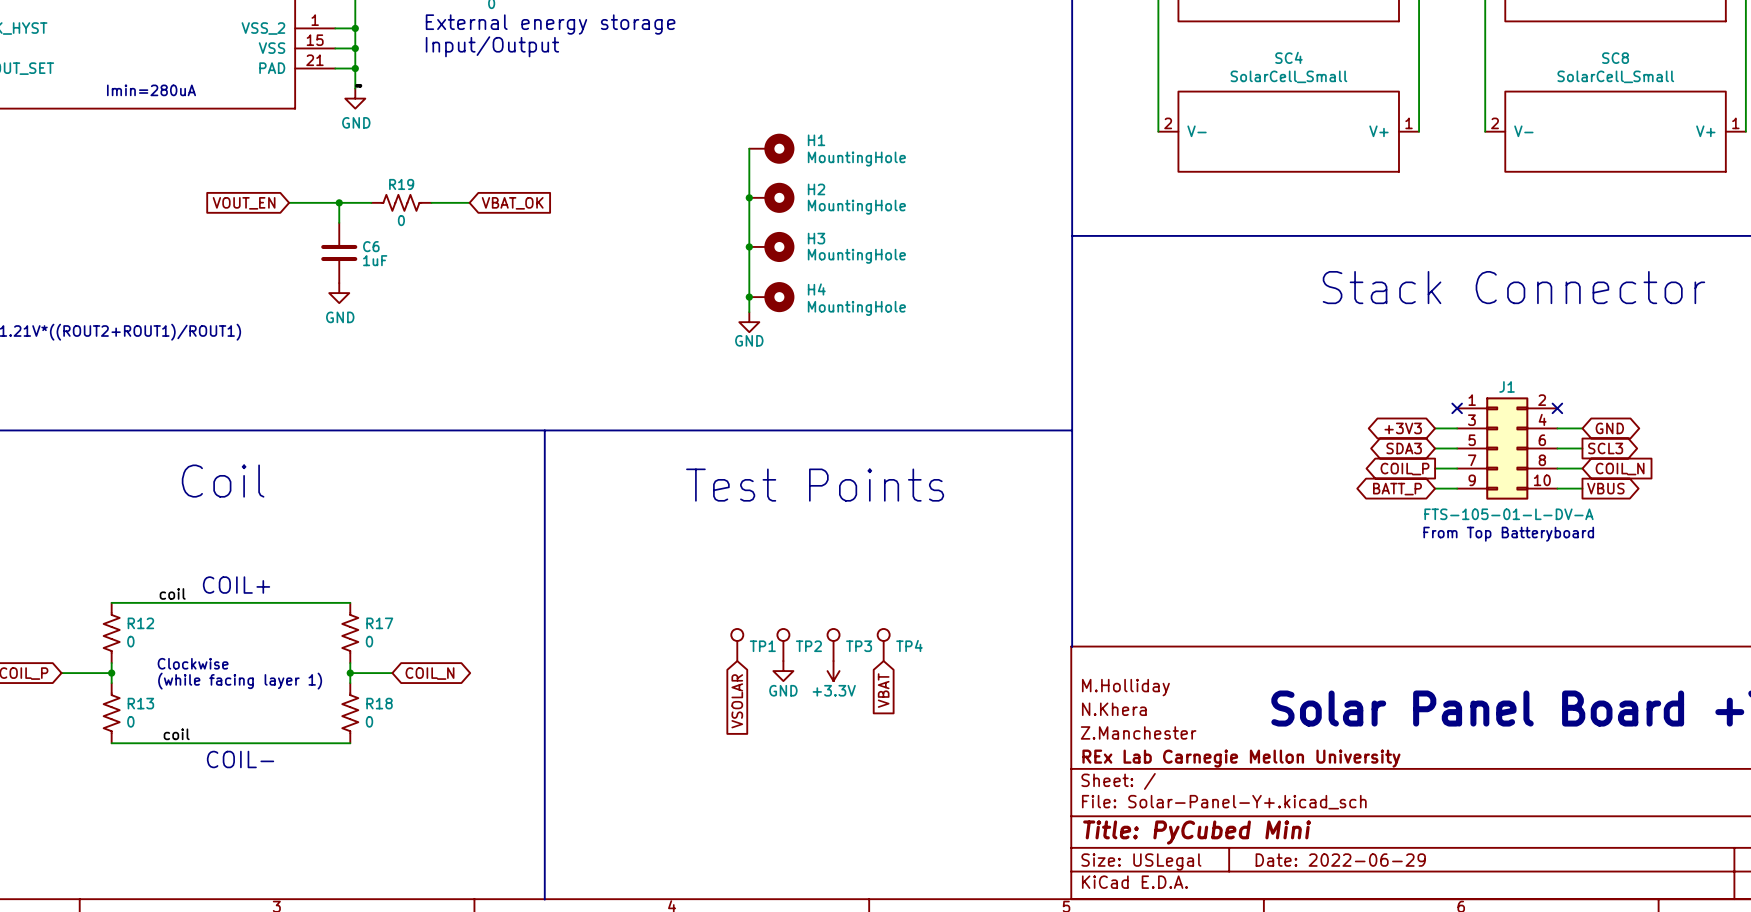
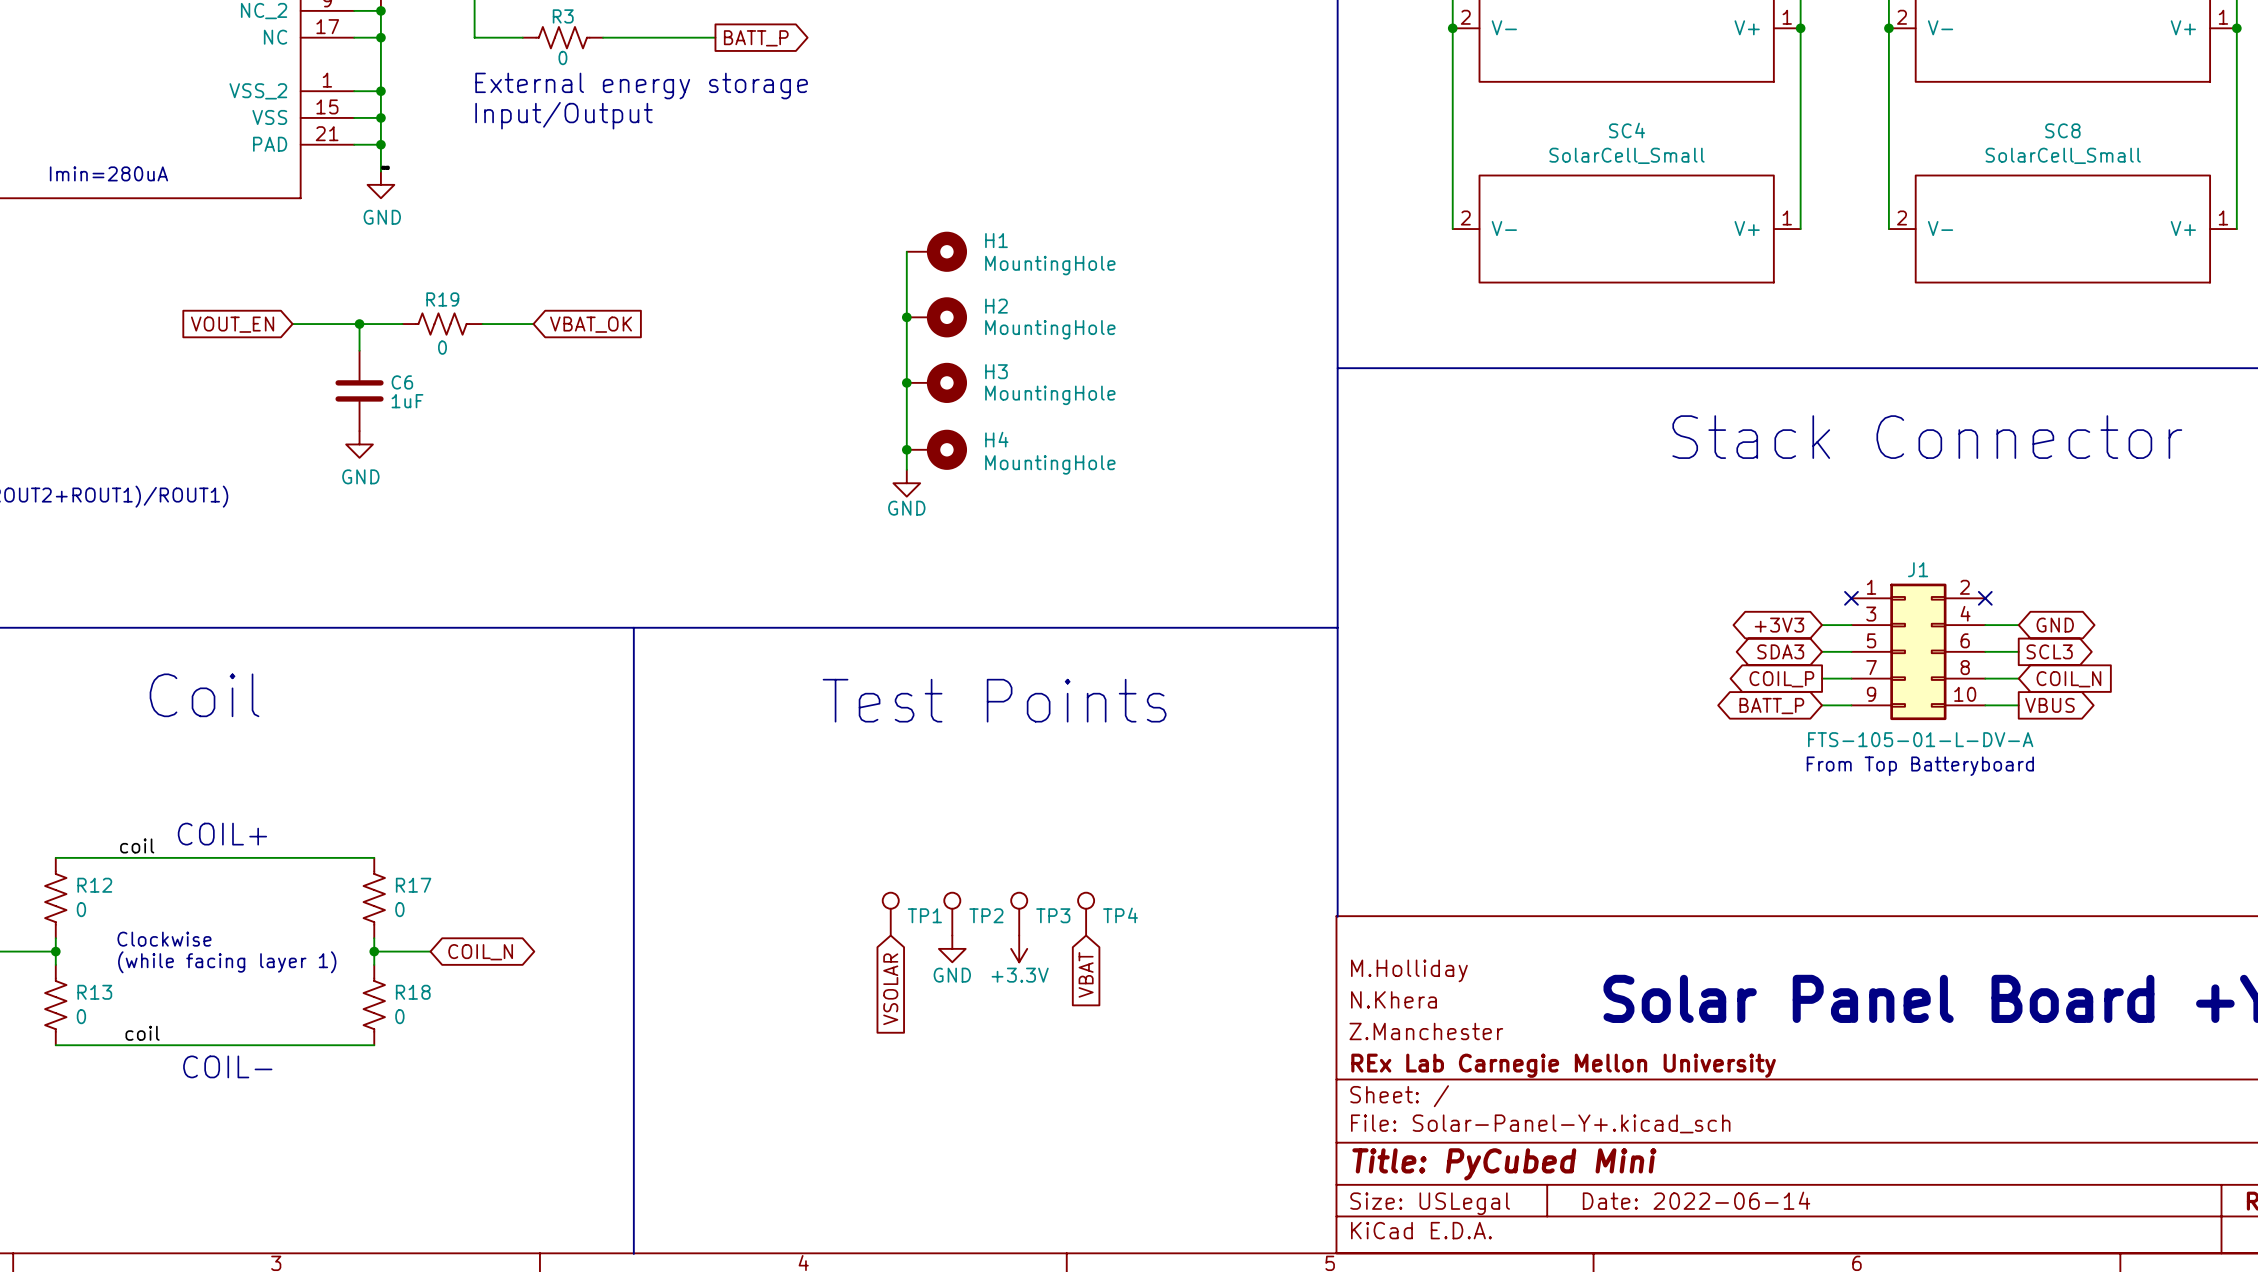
title block: Date: 2022-06-29 (1340, 860) -> Date: 2022-06-14 (1696, 1200)

